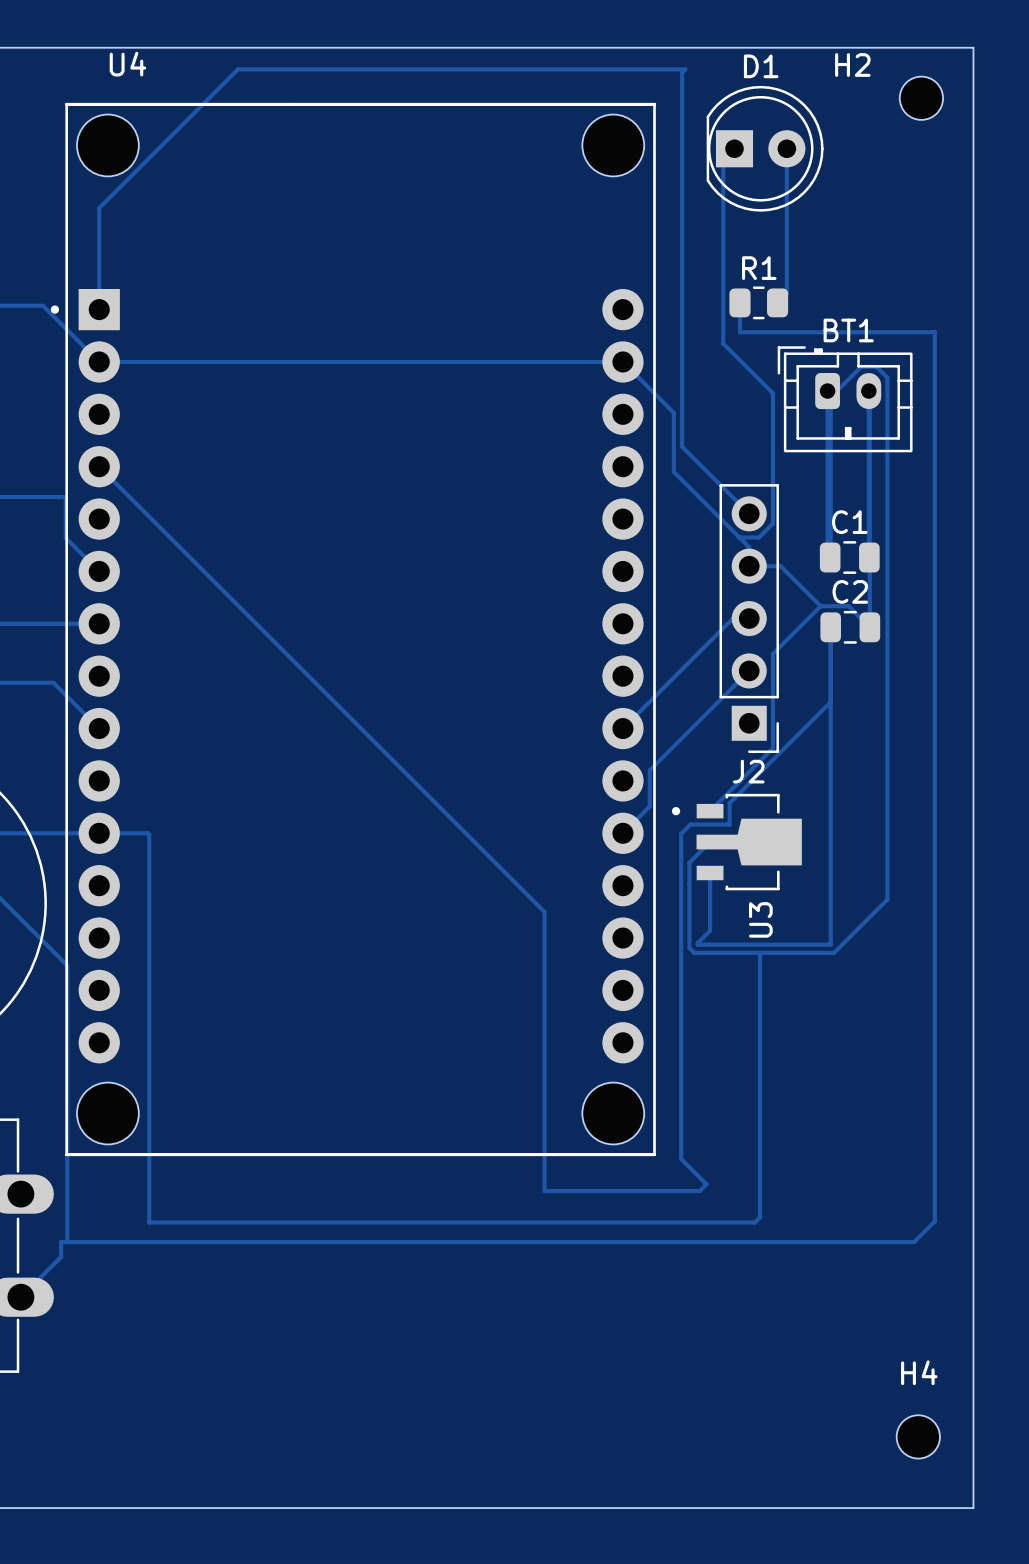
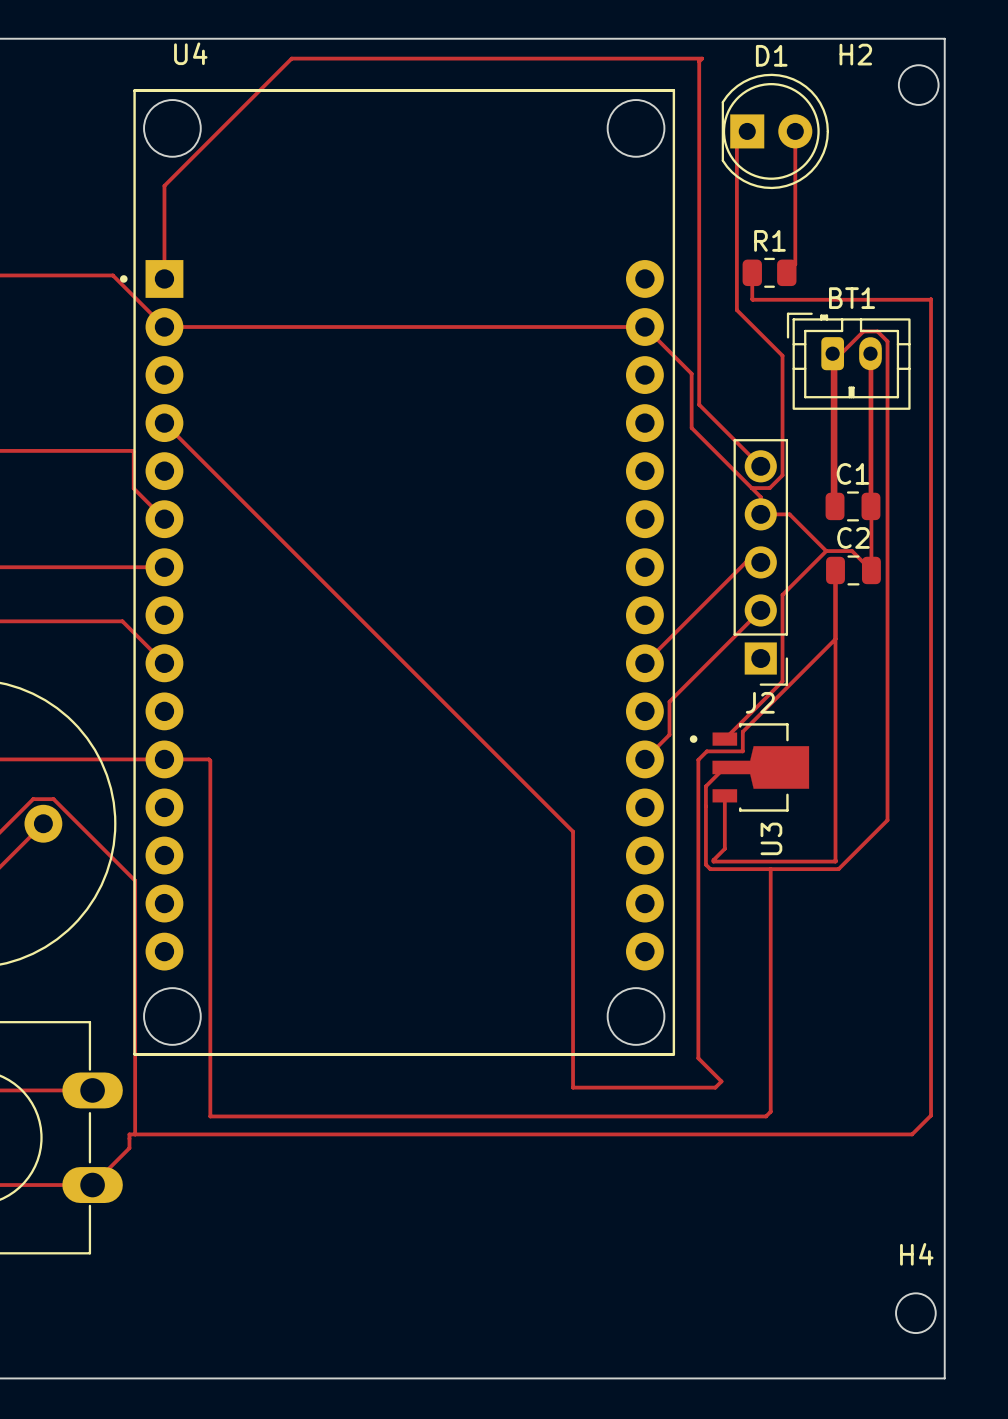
board edge: (949, 47) (973, 47) (973, 1508) (949, 1508) -> (944, 38) (944, 1378)

